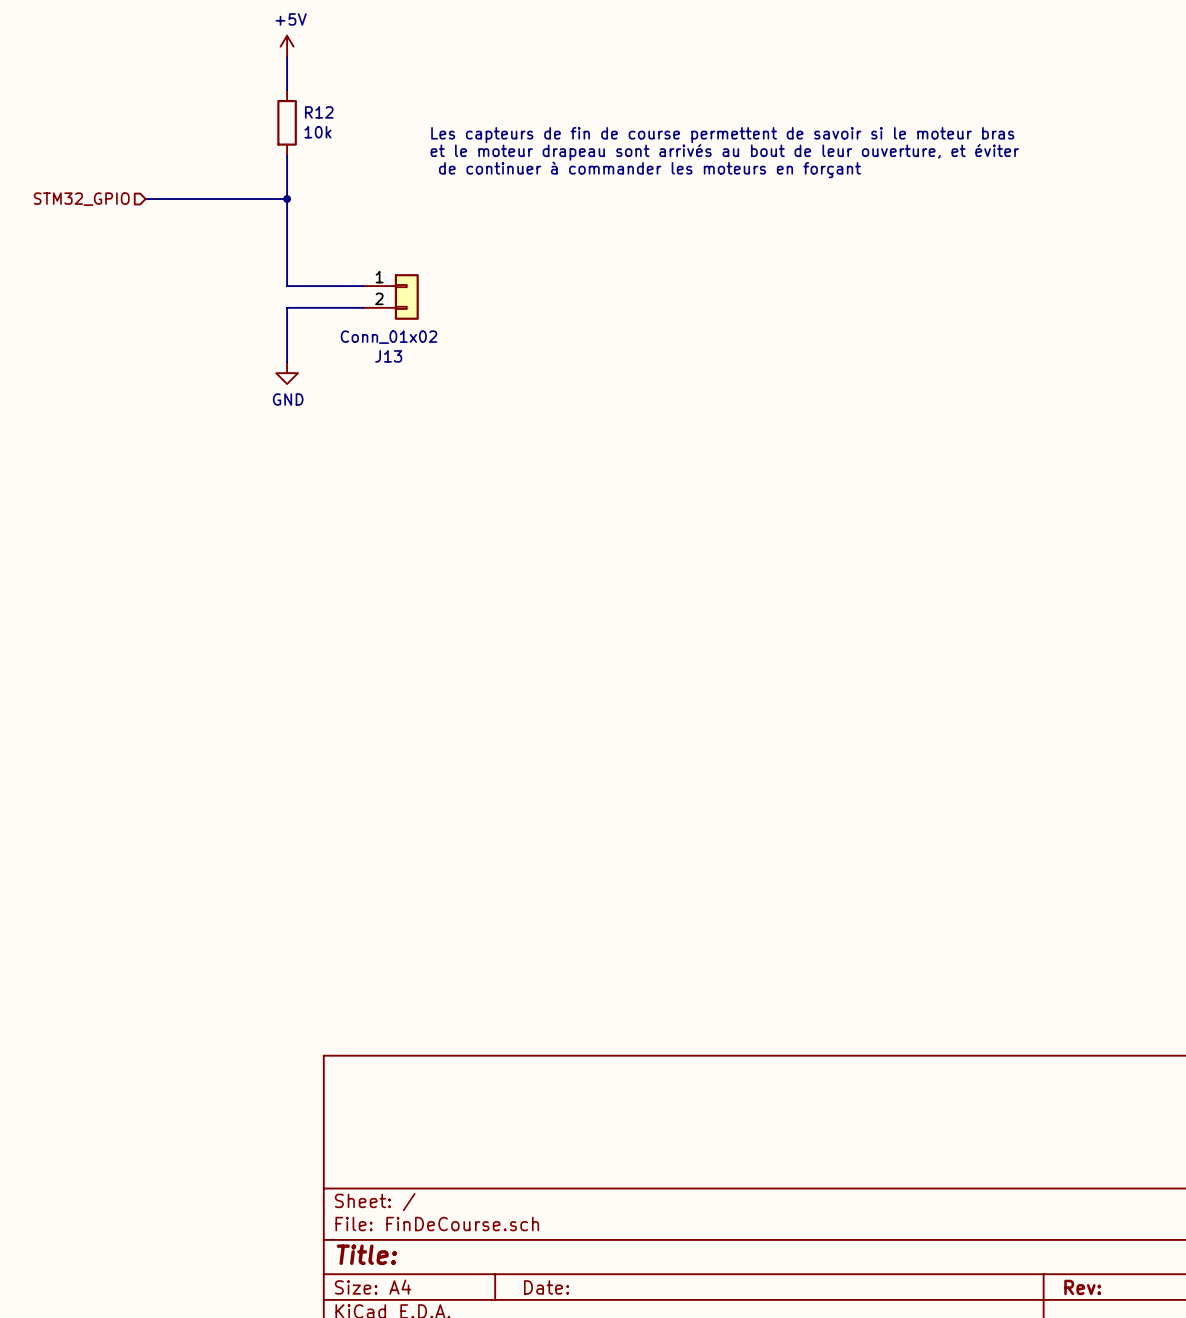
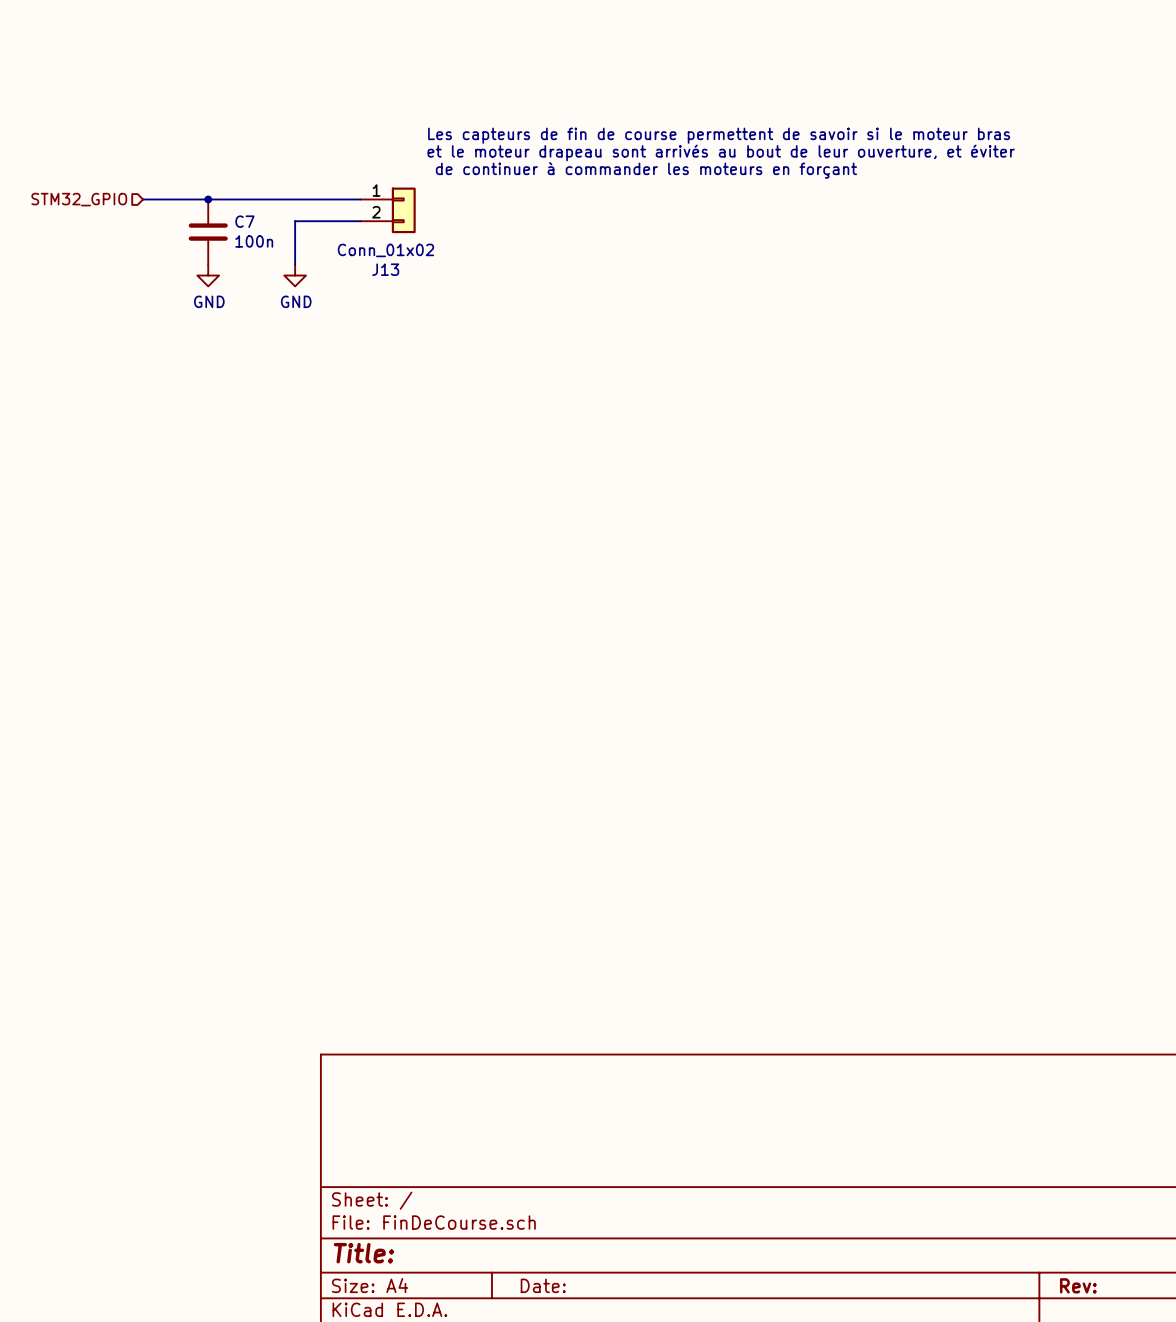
power symbol: +5V (287, 46) -> none
wire: (287, 57) (287, 90) -> none
R12: 10k (287, 122) -> none
wire: (287, 155) (287, 286) (363, 286) -> none
junction: none -> (208, 199)
wire: none -> (284, 199) (360, 199)
junction: (287, 199) -> none
wire: none -> (360, 221) (295, 221) (295, 264)
C7: none -> 100n (208, 232)
power symbol: none -> GND (208, 275)
power symbol: none -> GND (295, 275)
J13 position: (391, 296) -> (388, 210)
wire: (363, 307) (287, 307) (287, 362) -> none
power symbol: GND (287, 373) -> none

